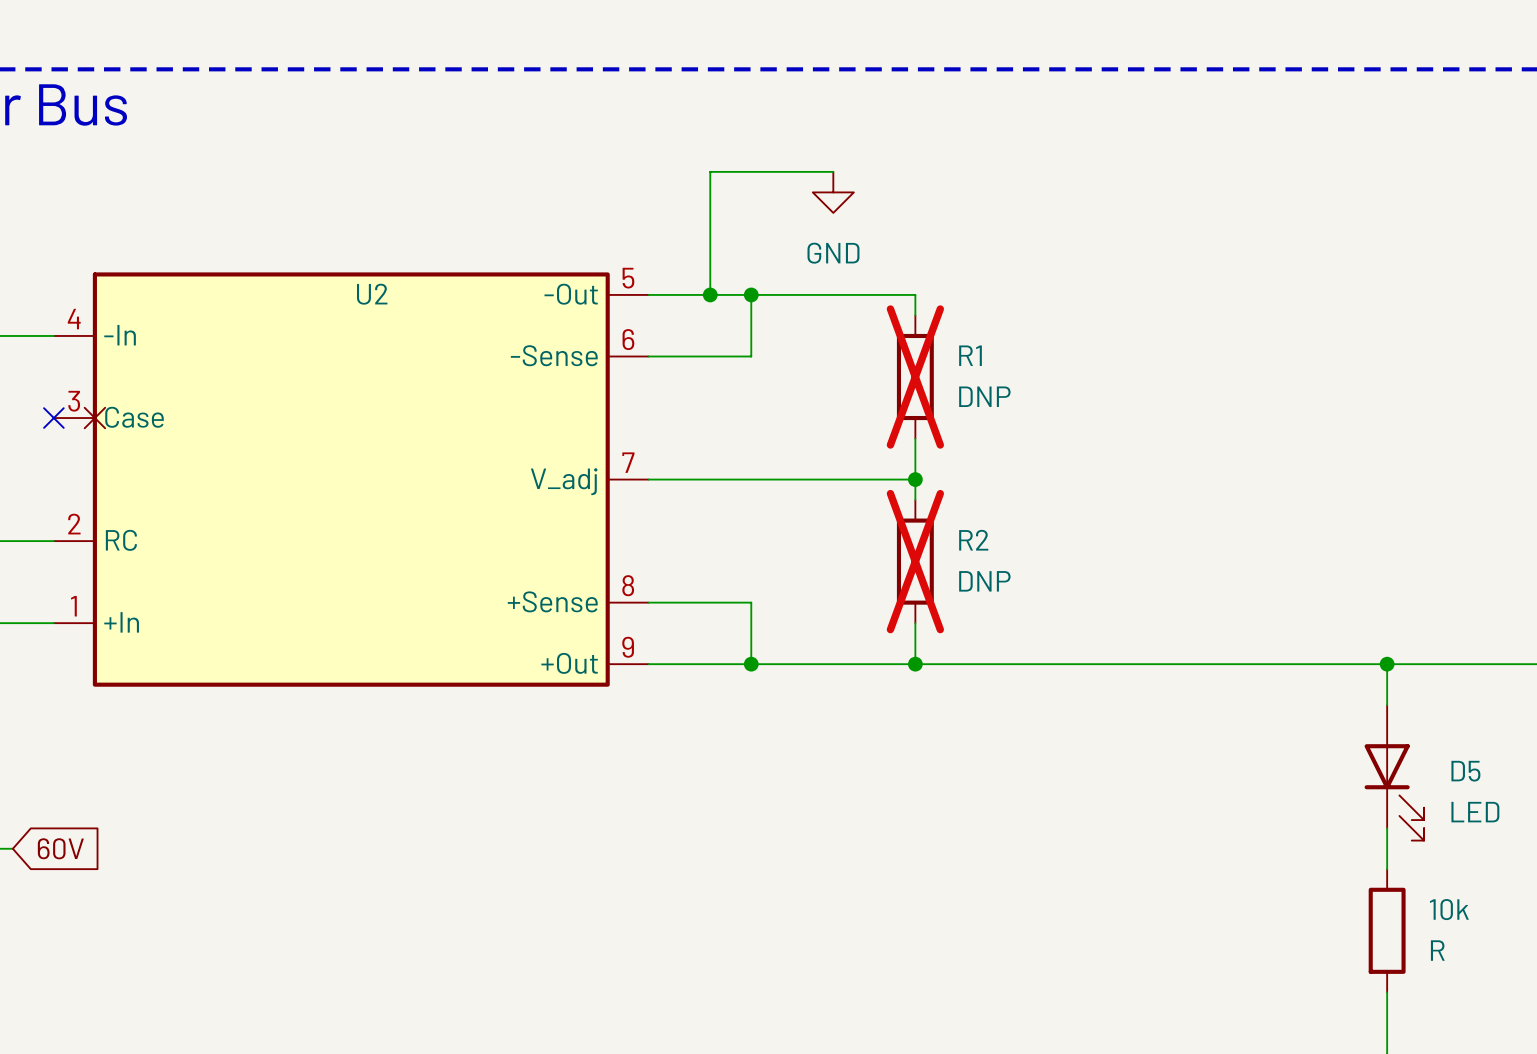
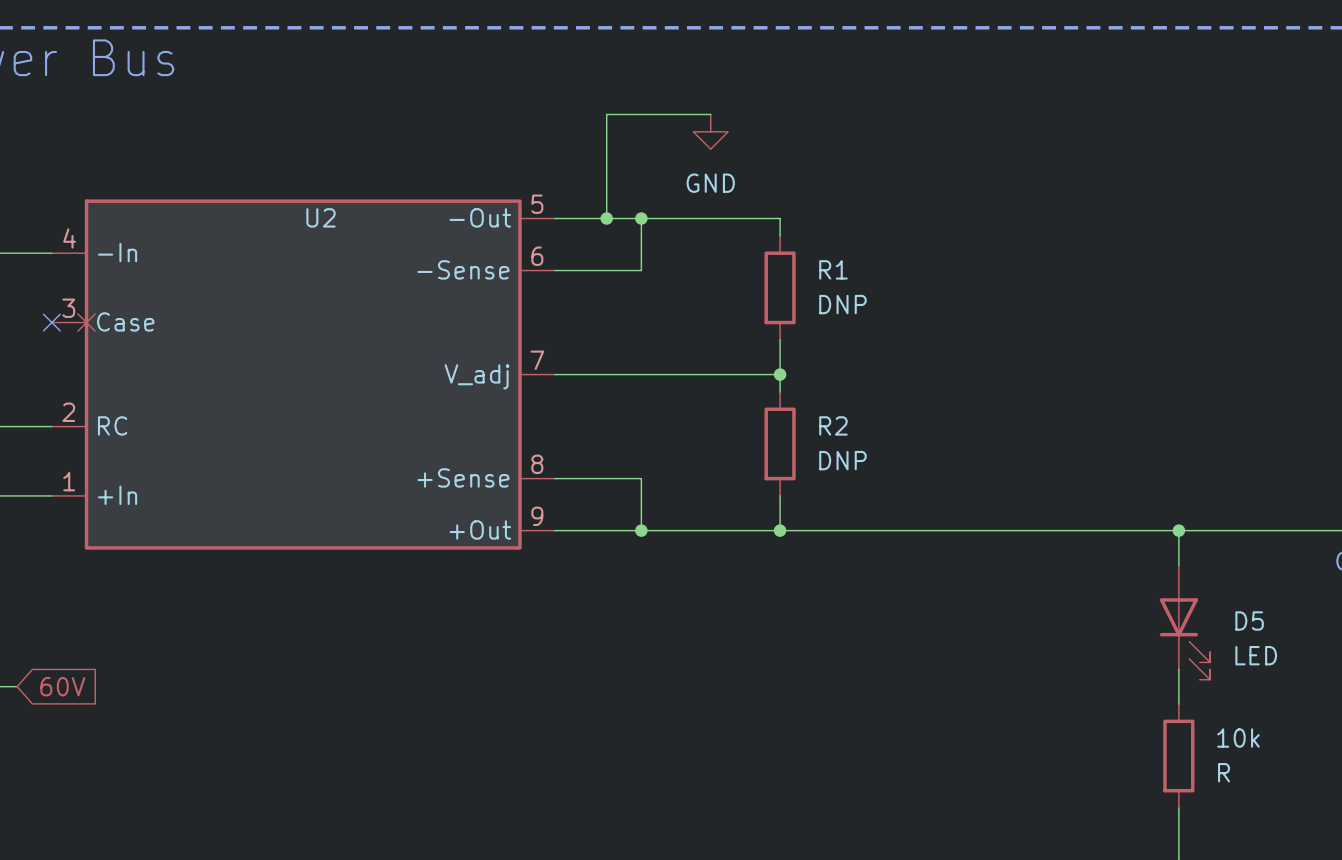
R1 do-not-place cross: (915, 377) -> none
R2 do-not-place cross: (915, 561) -> none

